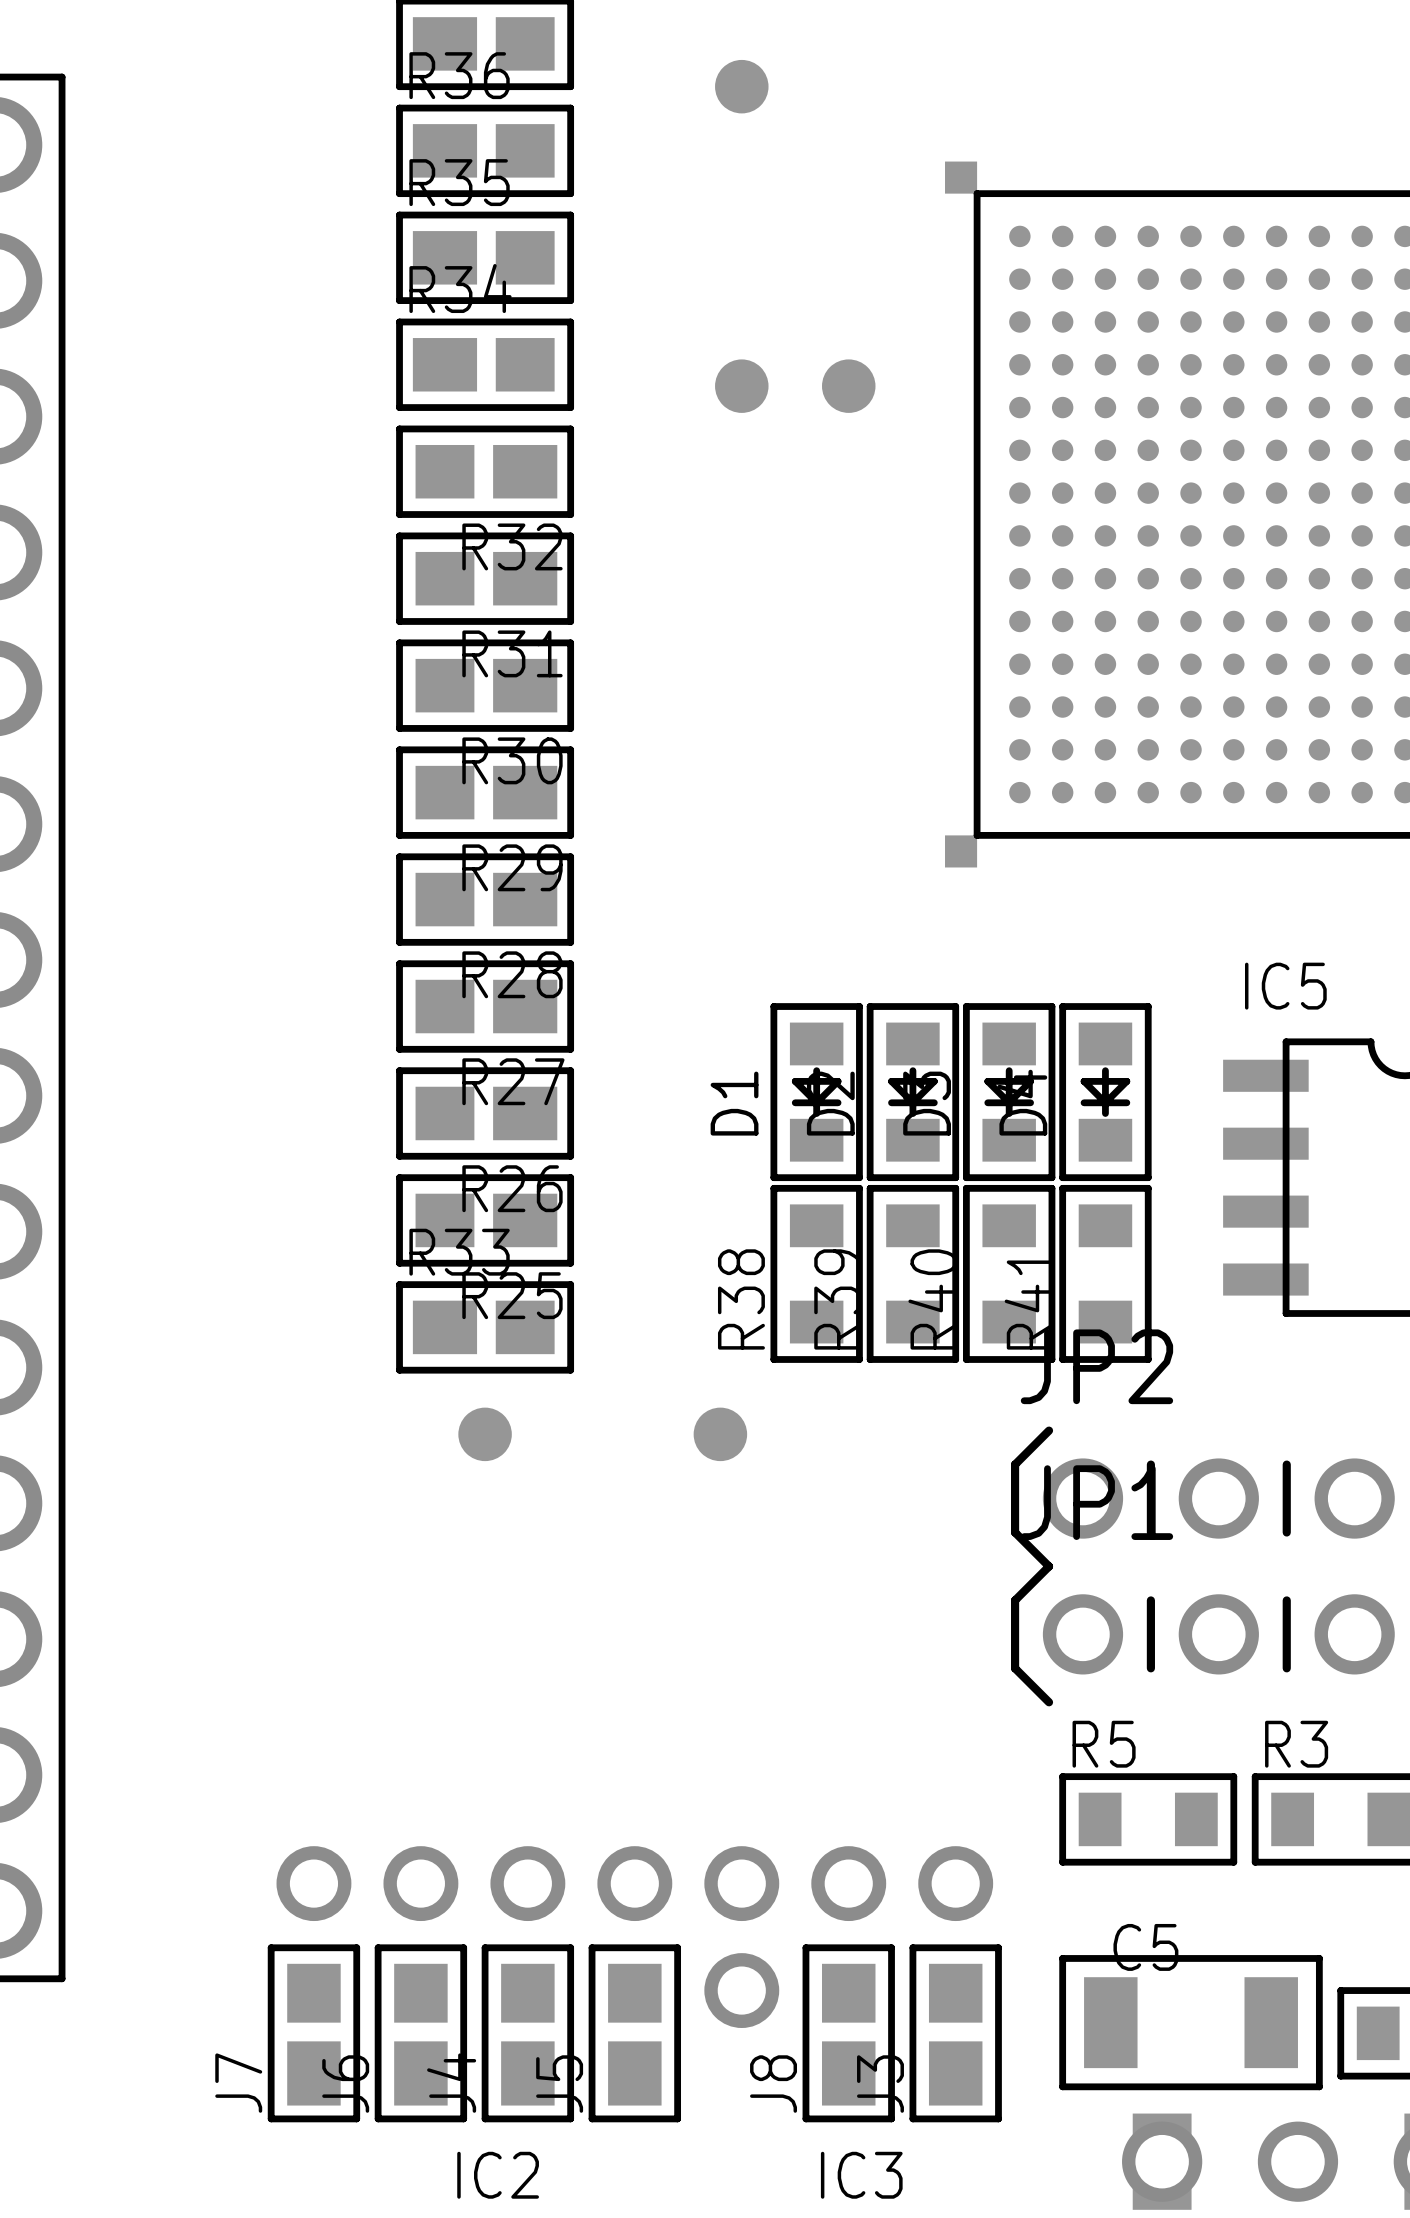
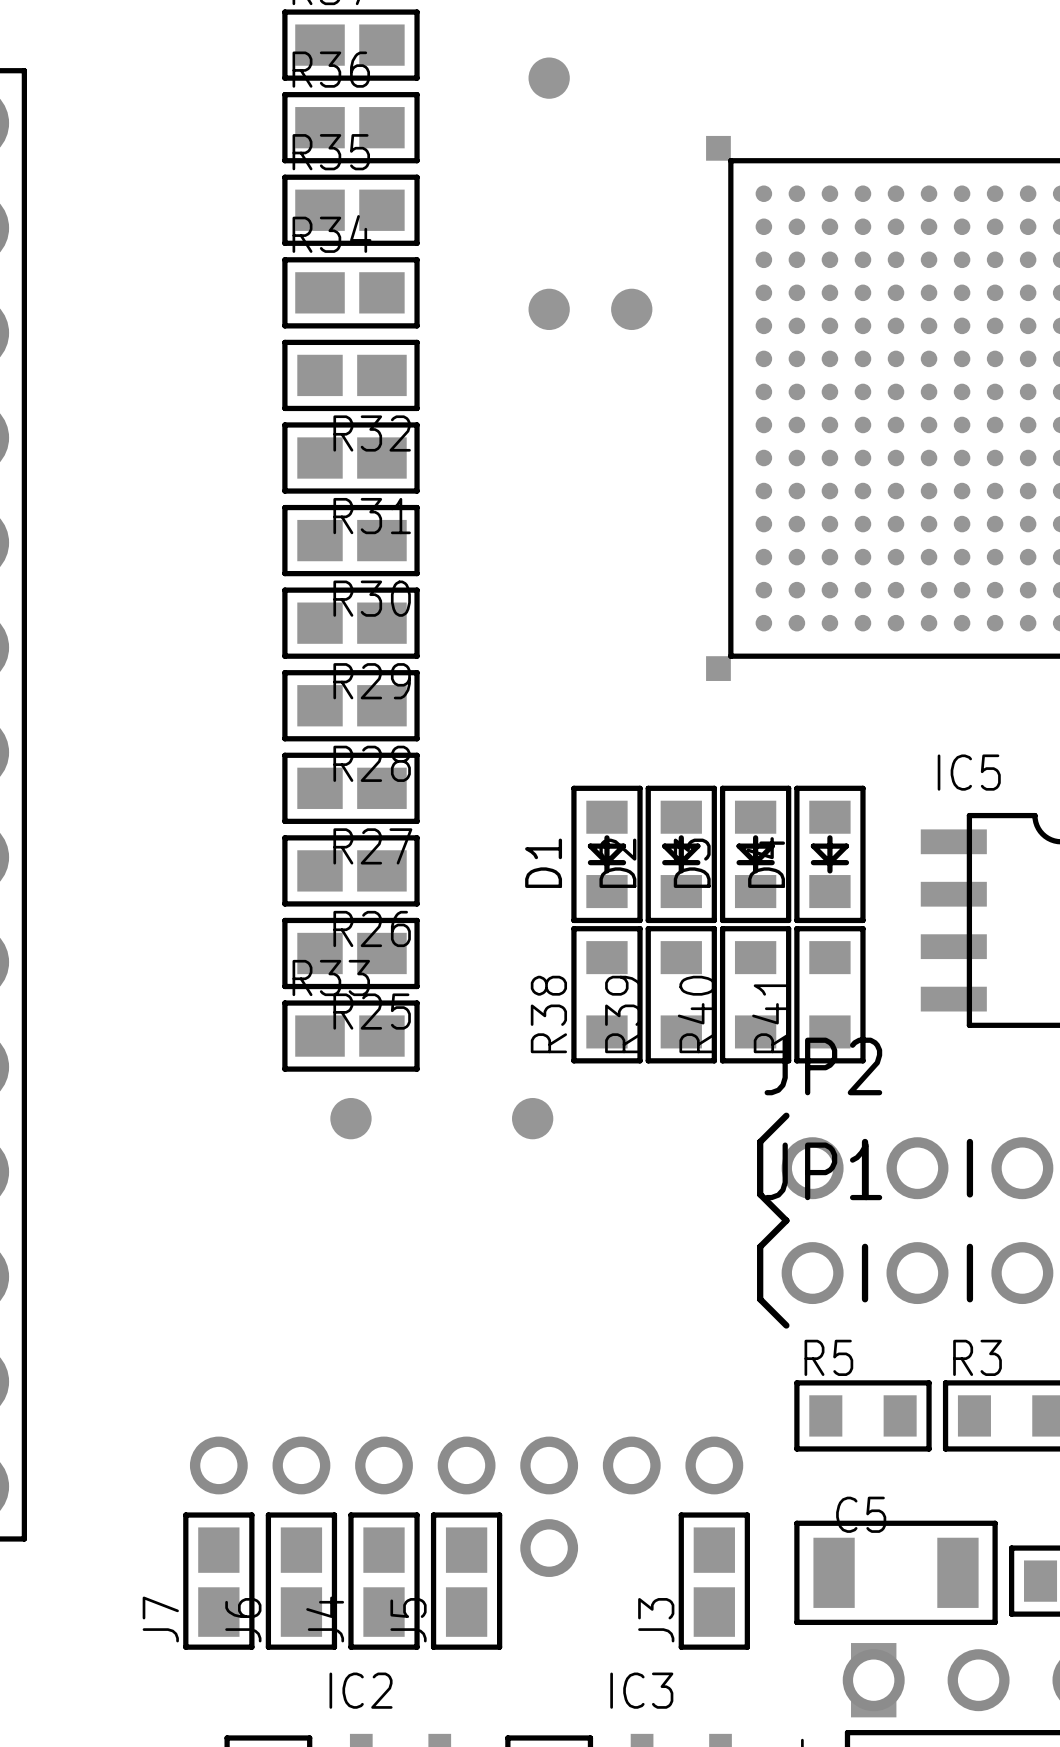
J8: (848, 2033) -> none

